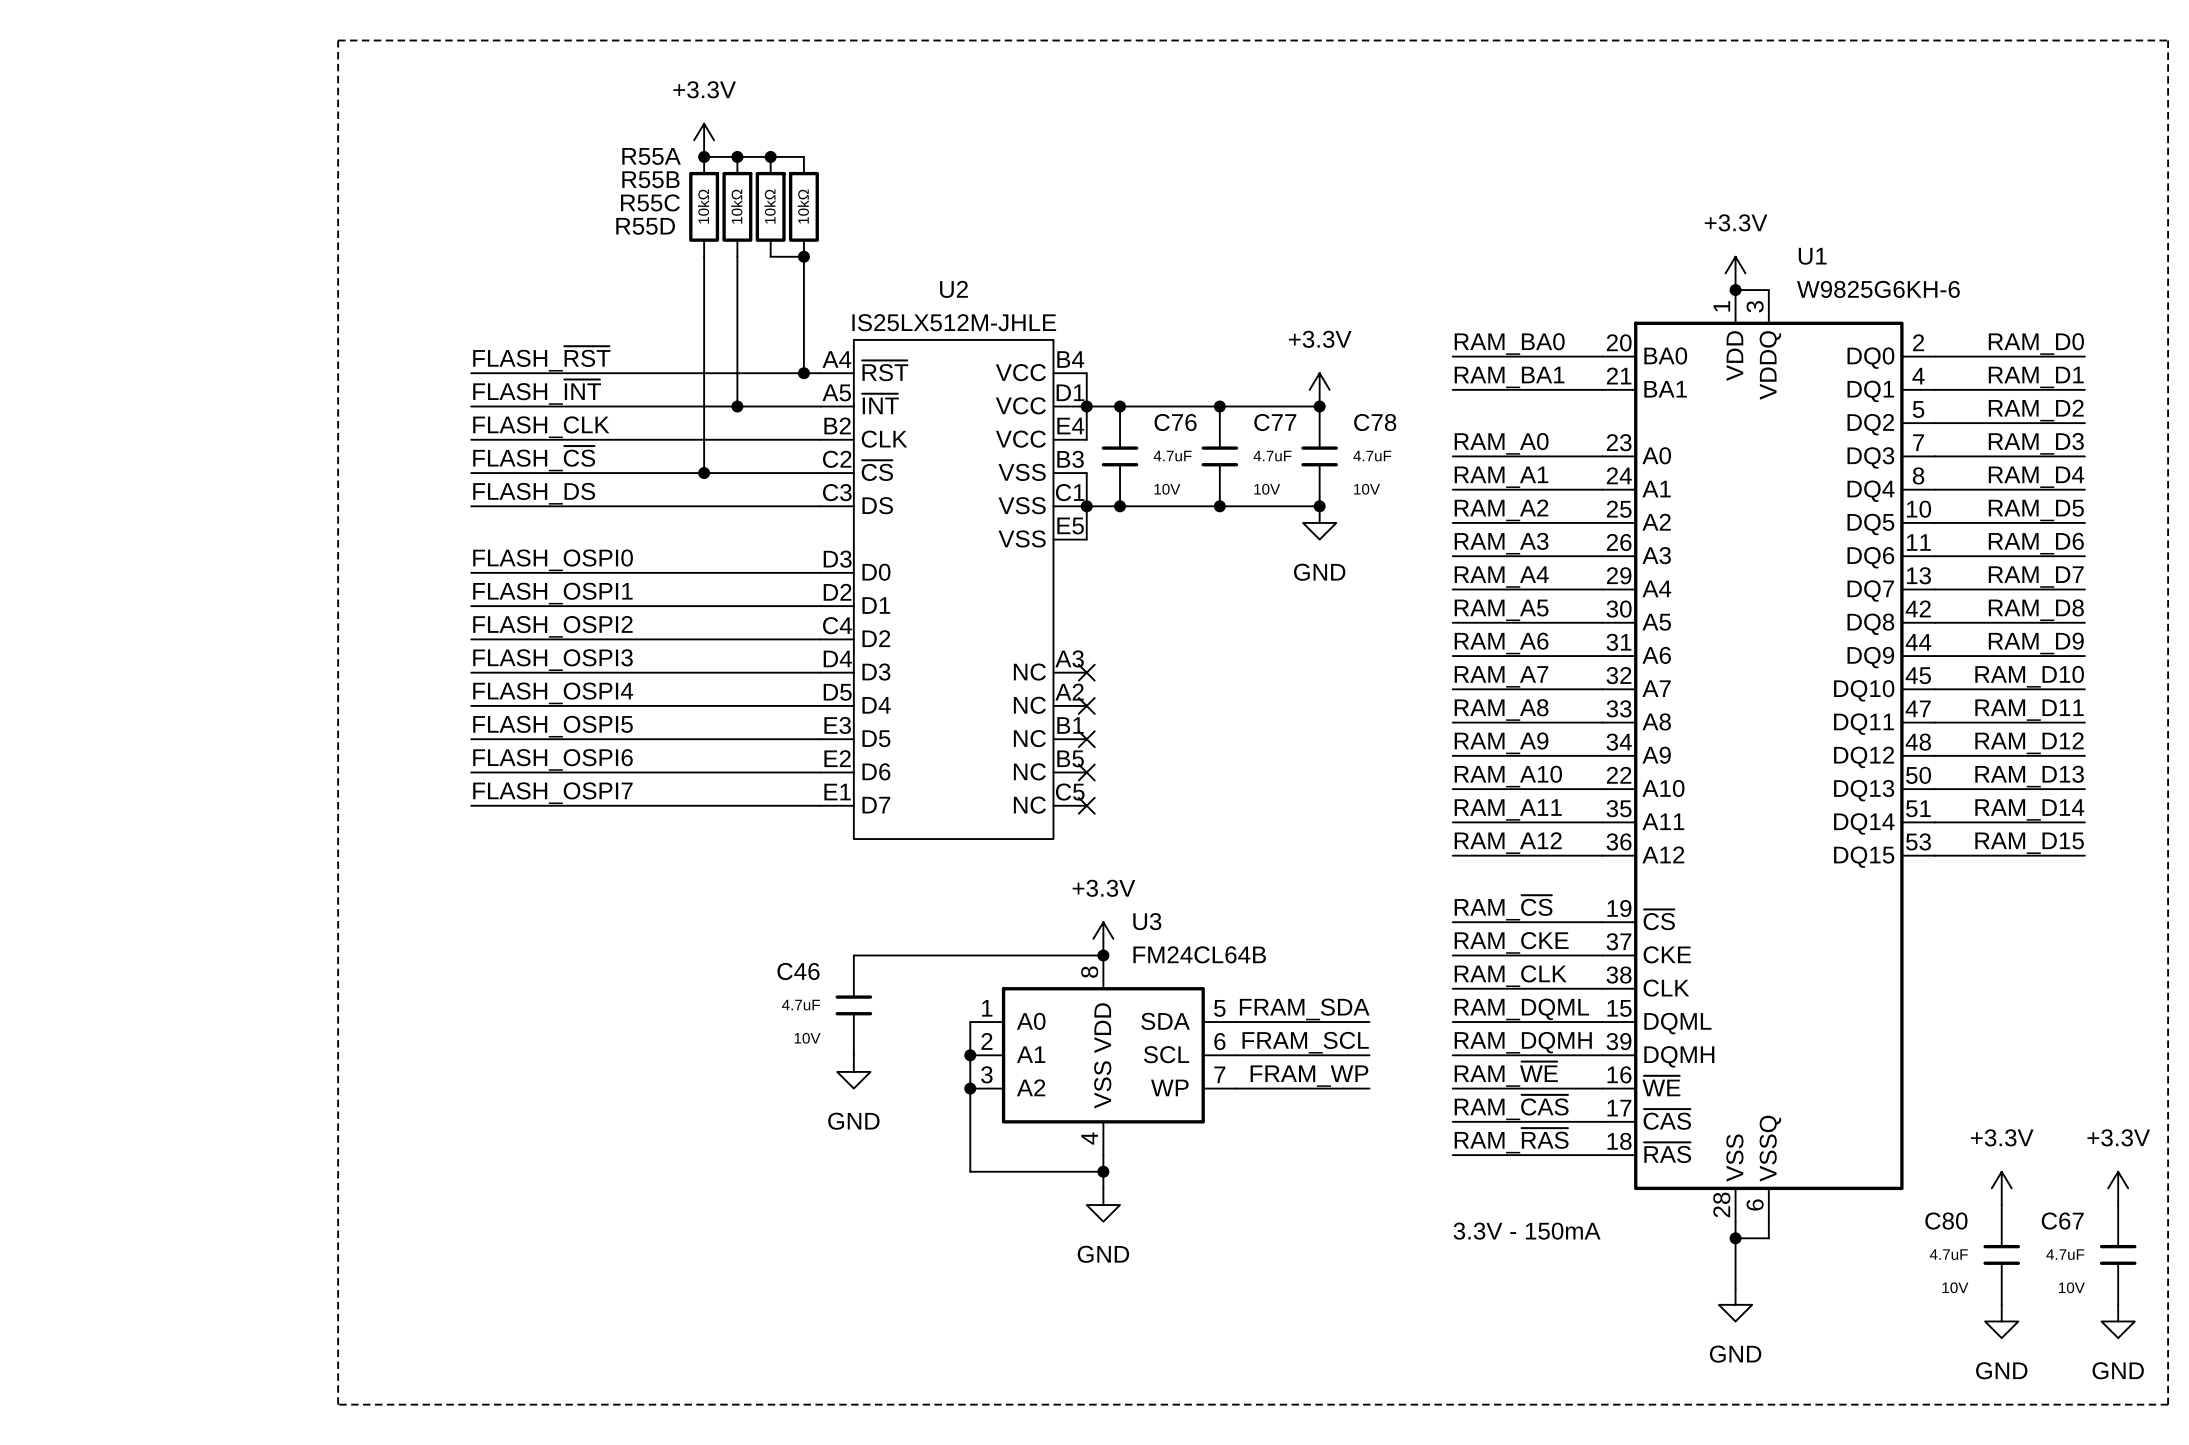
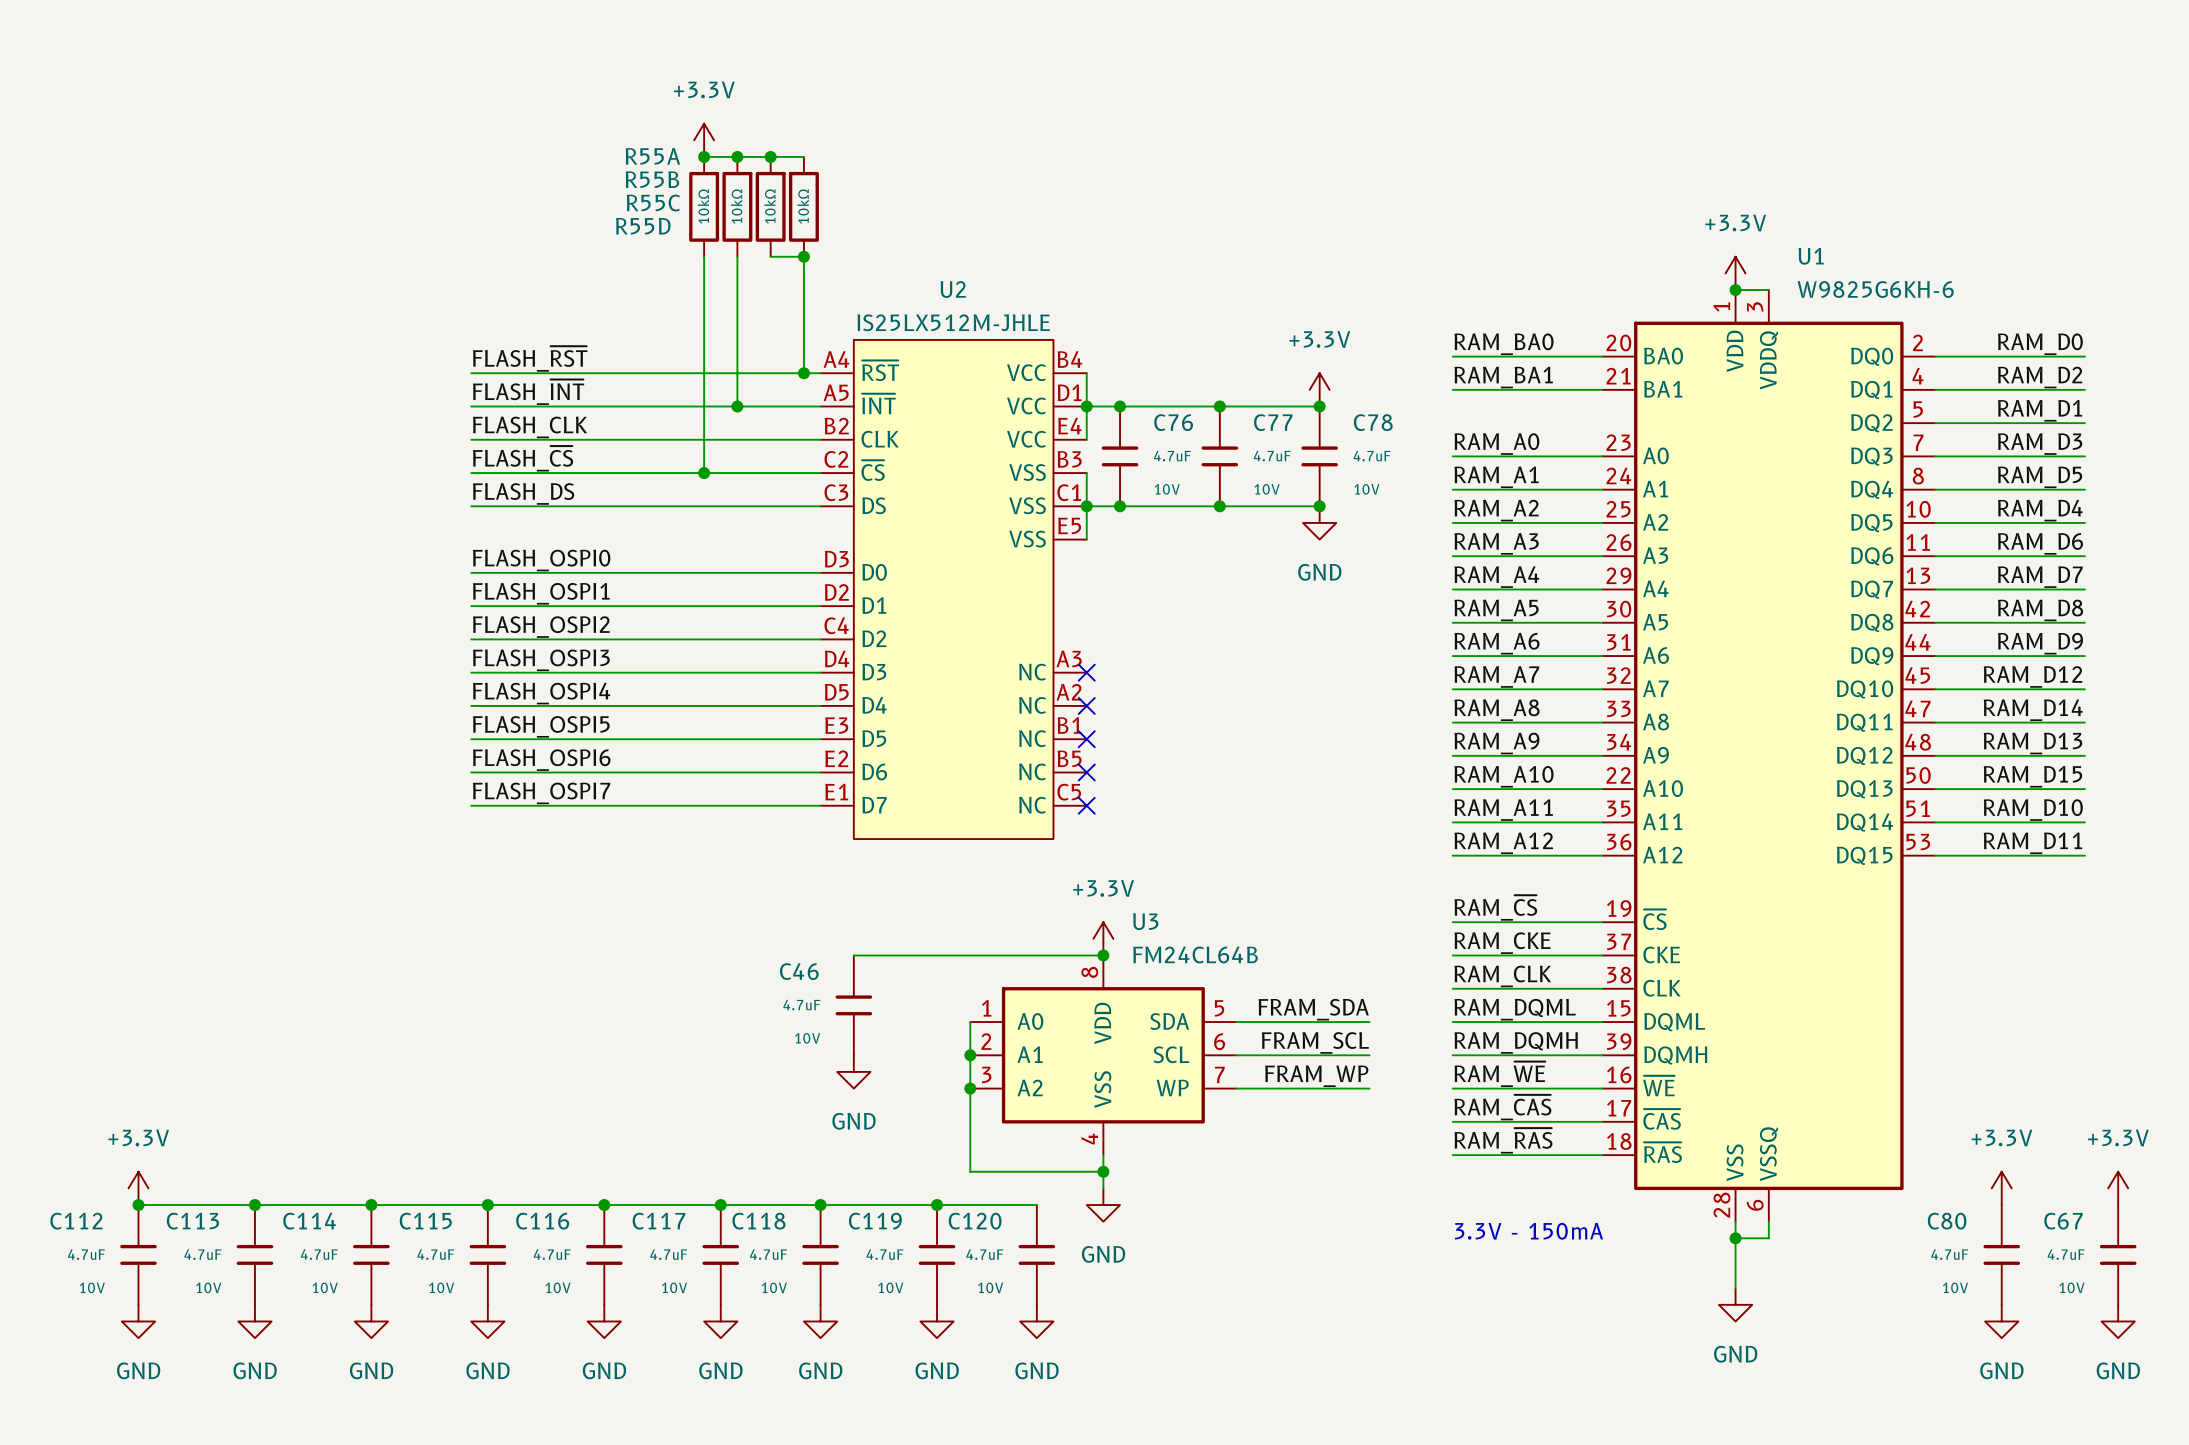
line: (338, 40) (2168, 40) (2168, 1404) (338, 1404) (338, 40) -> none
label: RAM_D1 (2036, 377) -> RAM_D2 (2040, 377)
label: RAM_D2 (2036, 410) -> RAM_D1 (2040, 410)
label: RAM_D4 (2036, 477) -> RAM_D5 (2040, 477)
label: RAM_D5 (2036, 510) -> RAM_D4 (2040, 510)
label: RAM_D10 (2029, 676) -> RAM_D12 (2032, 676)
label: RAM_D11 (2029, 710) -> RAM_D14 (2033, 710)
label: RAM_D12 (2029, 743) -> RAM_D13 (2032, 743)
label: RAM_D13 (2029, 776) -> RAM_D15 (2032, 776)
label: RAM_D14 (2029, 809) -> RAM_D10 (2033, 810)
label: RAM_D15 (2029, 843) -> RAM_D11 (2032, 843)
power symbol: none -> +3.3V (138, 1188)
wire: none -> (138, 1205) (1036, 1205)
junction: none -> (138, 1205)
junction: none -> (254, 1205)
junction: none -> (371, 1205)
junction: none -> (487, 1205)
junction: none -> (604, 1205)
junction: none -> (720, 1205)
junction: none -> (820, 1205)
junction: none -> (937, 1205)
C112: none -> 4.7uF (138, 1254)
C113: none -> 4.7uF (254, 1254)
C114: none -> 4.7uF (371, 1254)
C115: none -> 4.7uF (487, 1254)
C116: none -> 4.7uF (604, 1254)
C117: none -> 4.7uF (720, 1254)
C118: none -> 4.7uF (820, 1254)
C119: none -> 4.7uF (937, 1254)
C120: none -> 4.7uF (1036, 1254)
power symbol: none -> GND (138, 1321)
power symbol: none -> GND (254, 1321)
power symbol: none -> GND (371, 1321)
power symbol: none -> GND (487, 1321)
power symbol: none -> GND (604, 1321)
power symbol: none -> GND (720, 1321)
power symbol: none -> GND (820, 1321)
power symbol: none -> GND (937, 1321)
power symbol: none -> GND (1036, 1321)

